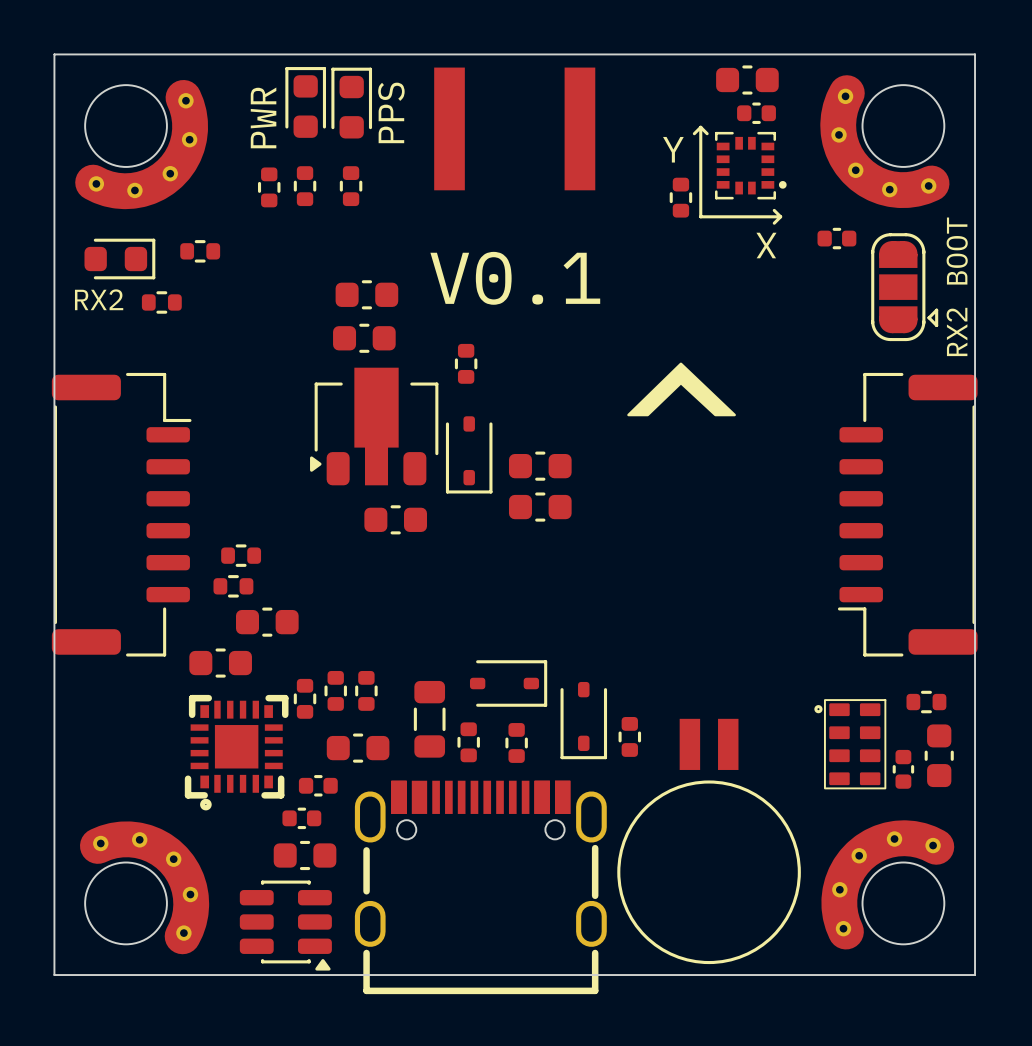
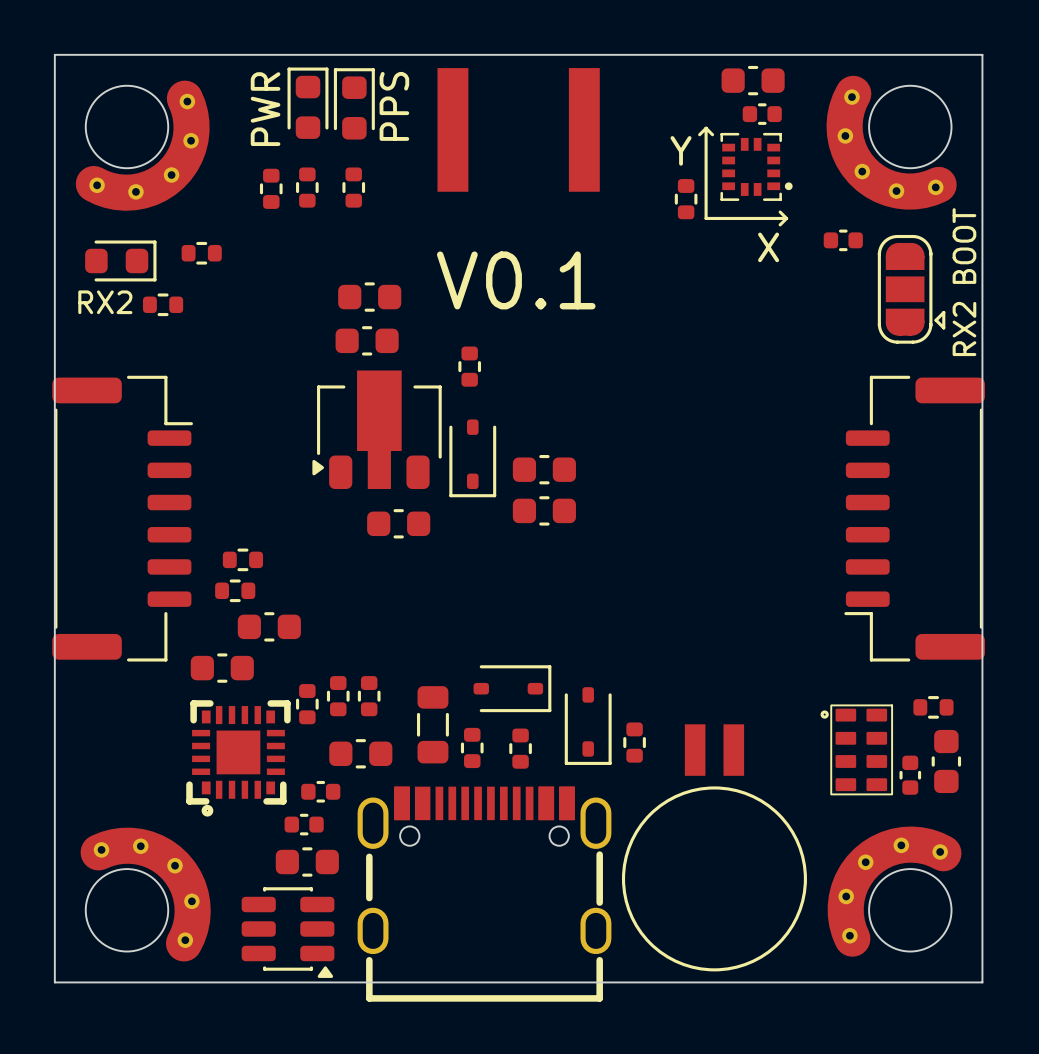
drawing: [627, 362, 736, 417] -> none

